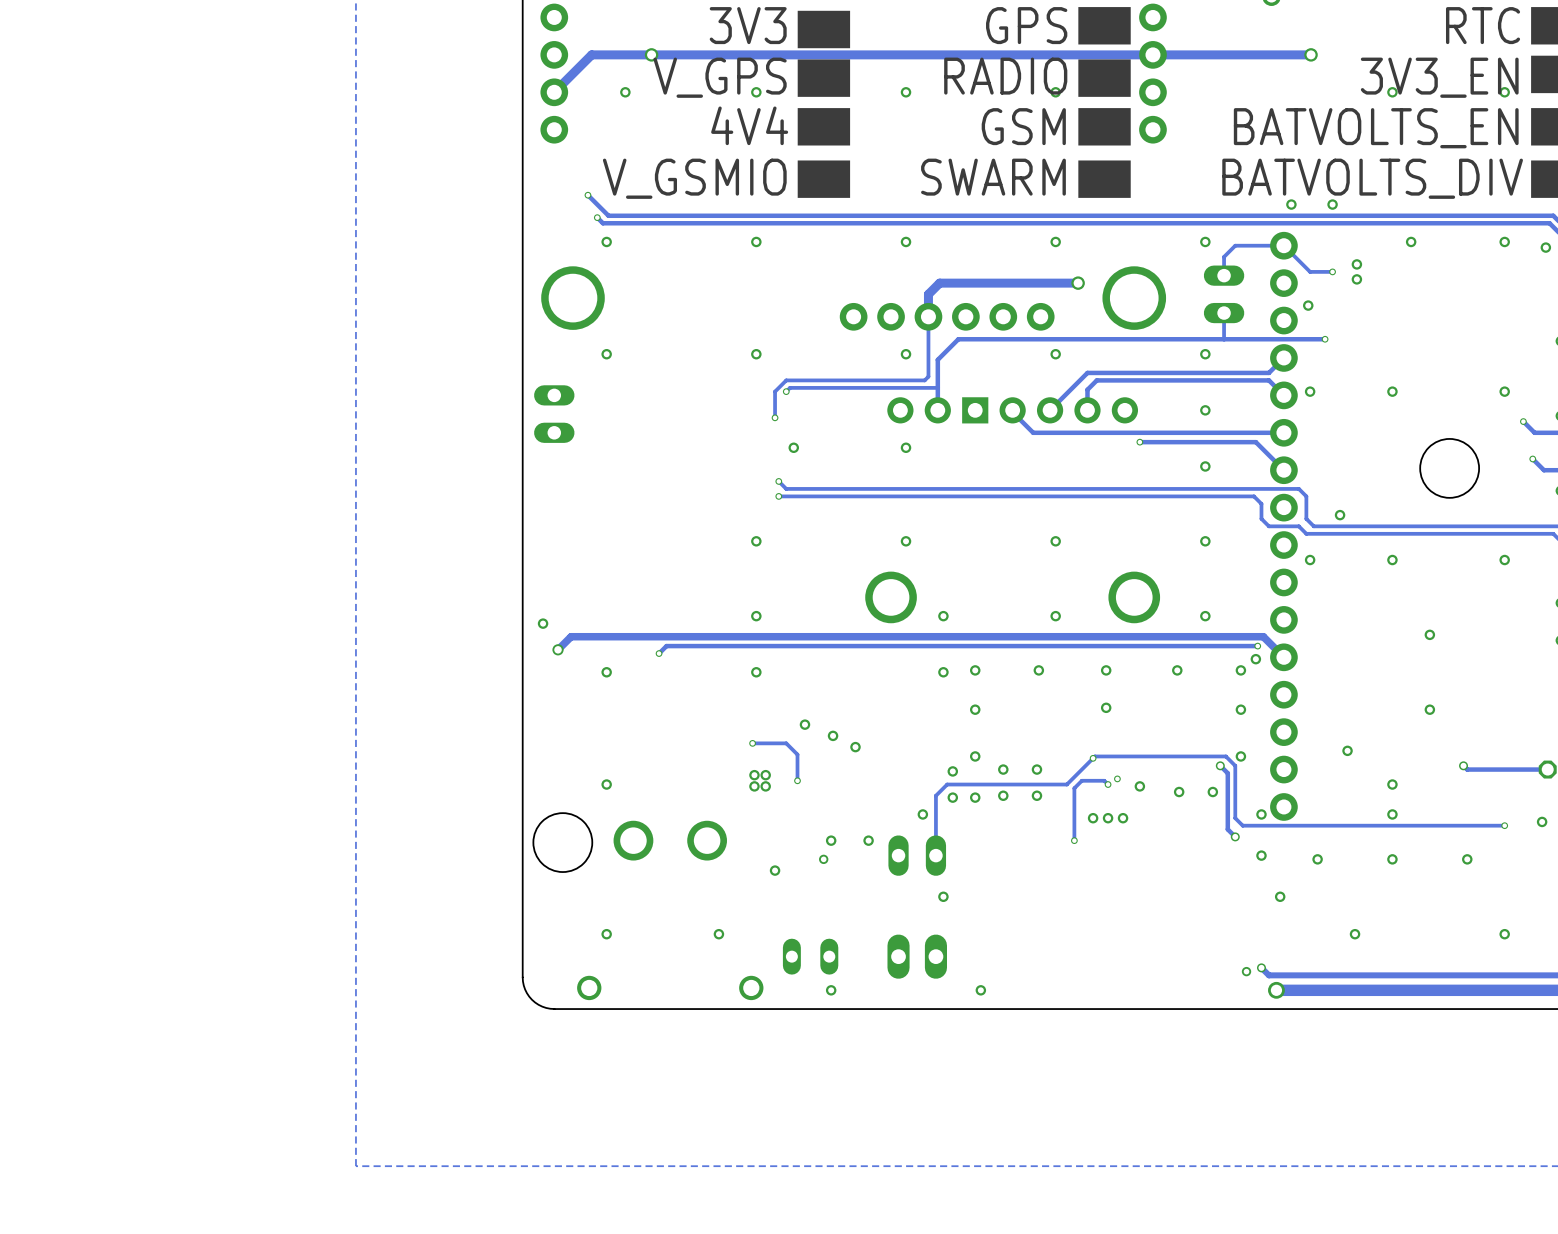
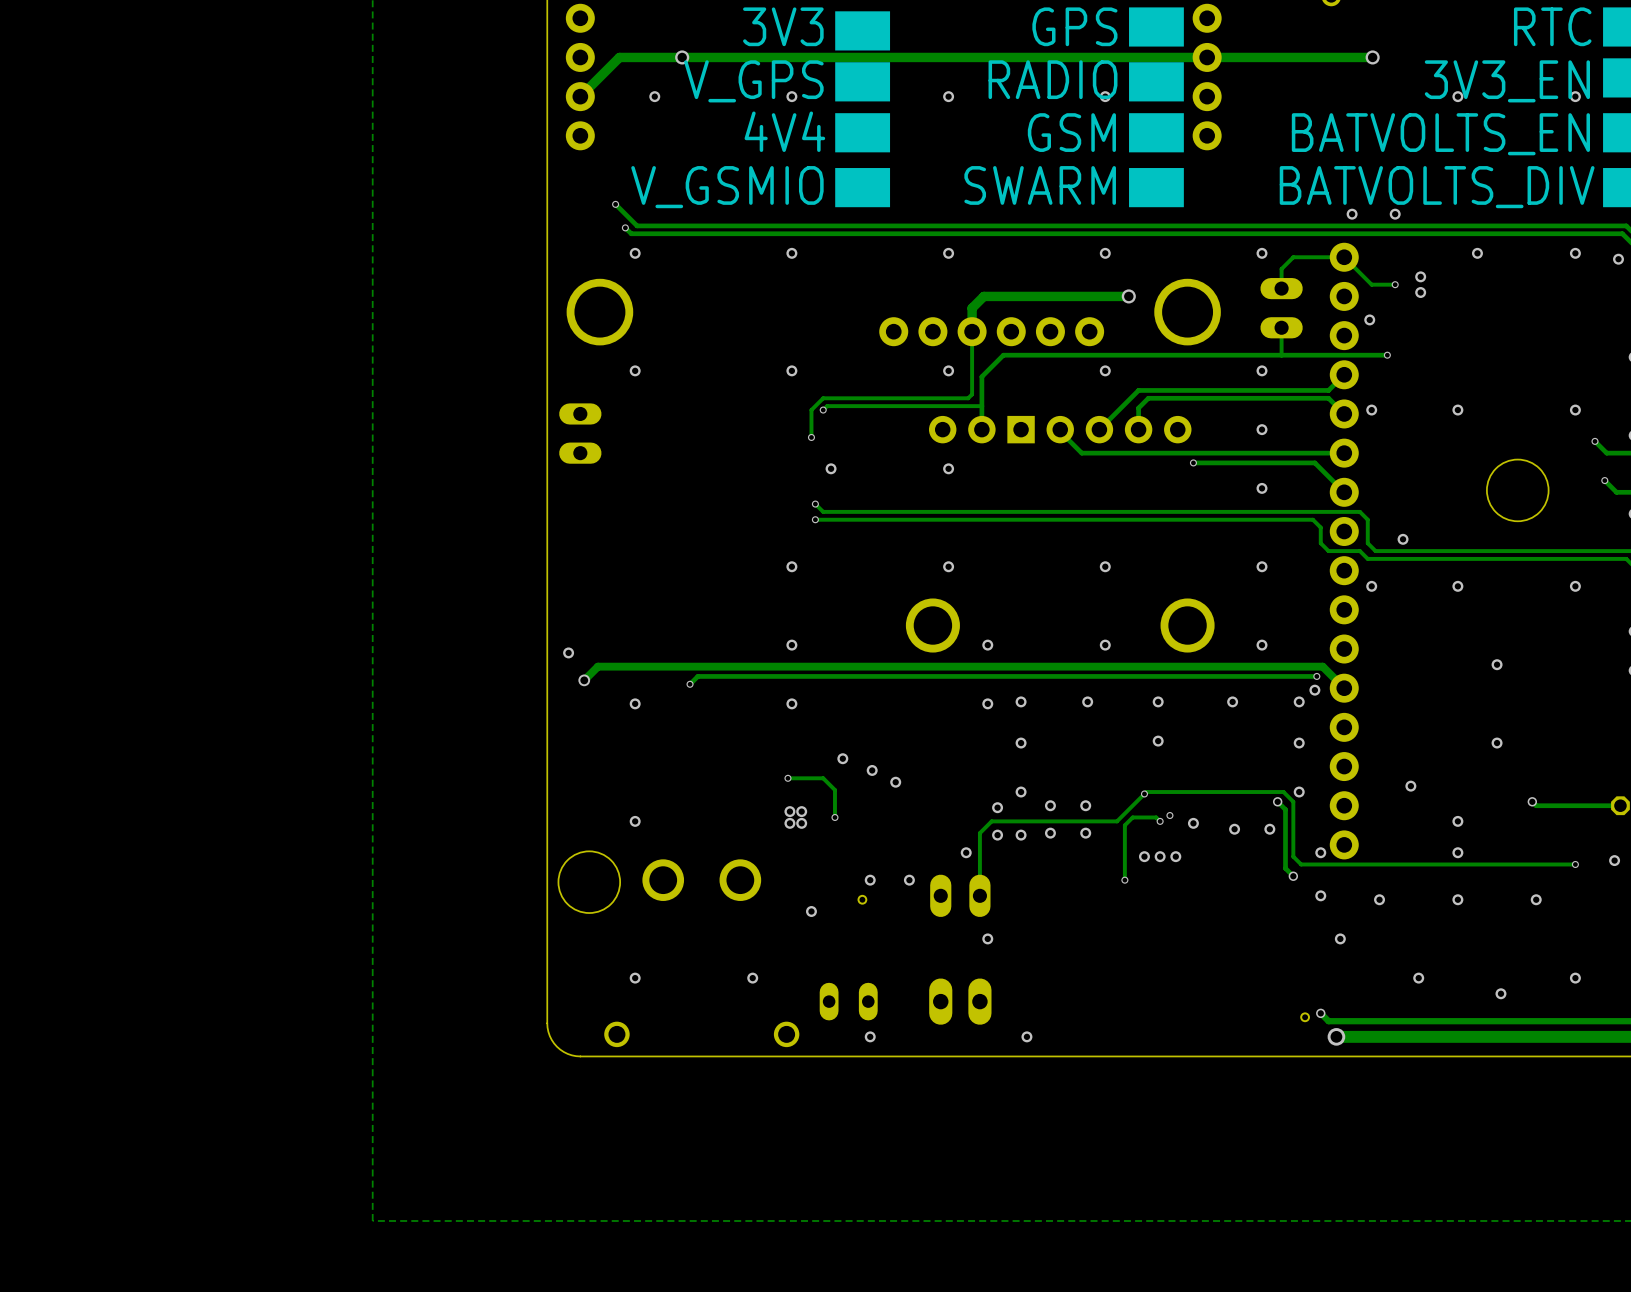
via: none -> (1500, 993)

